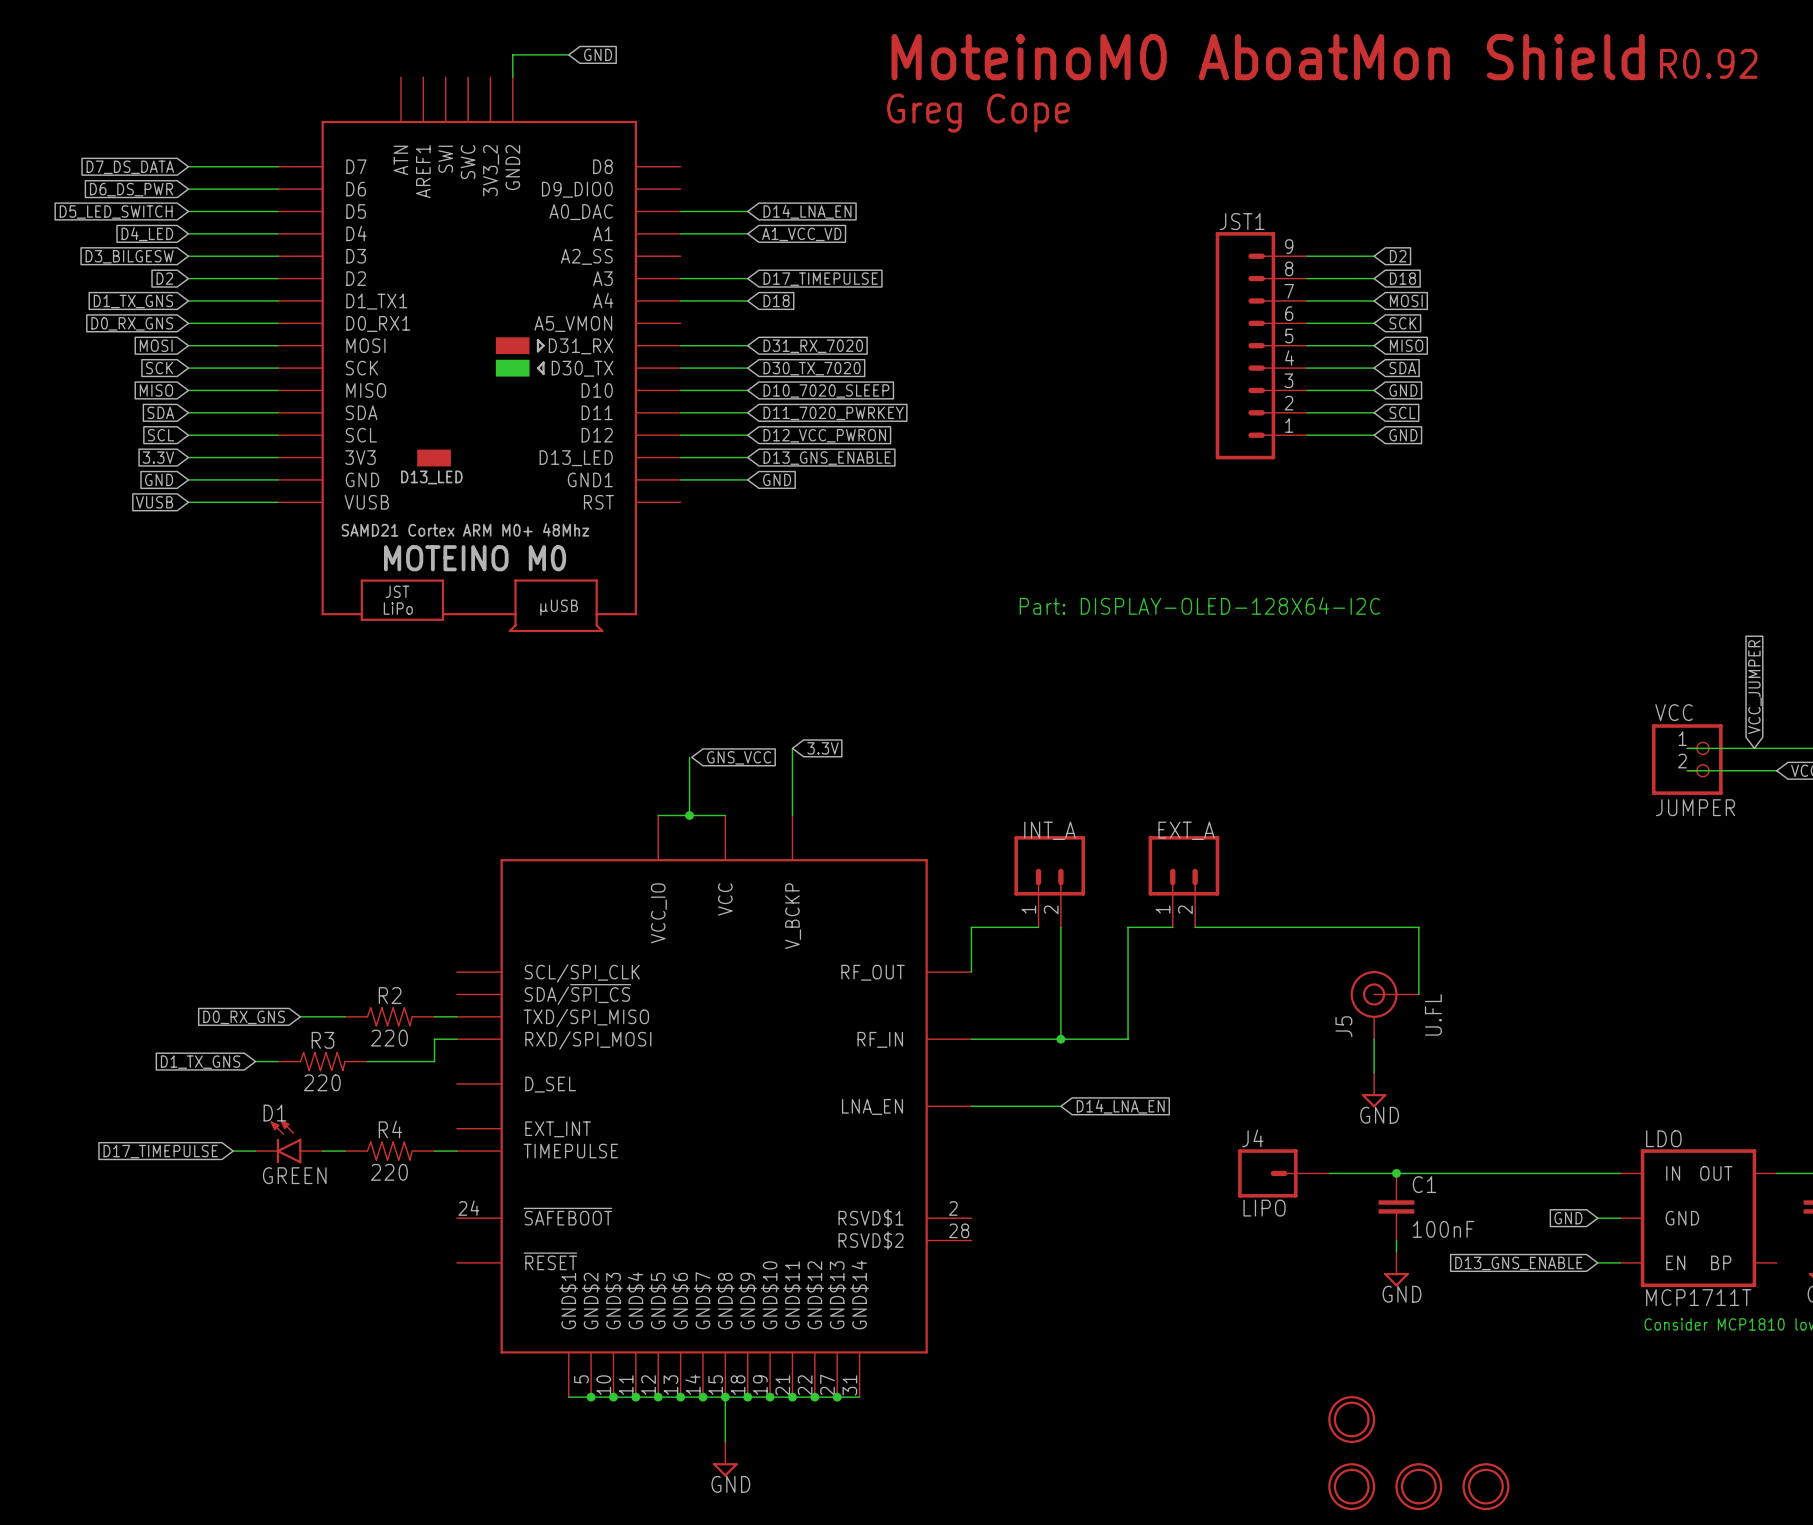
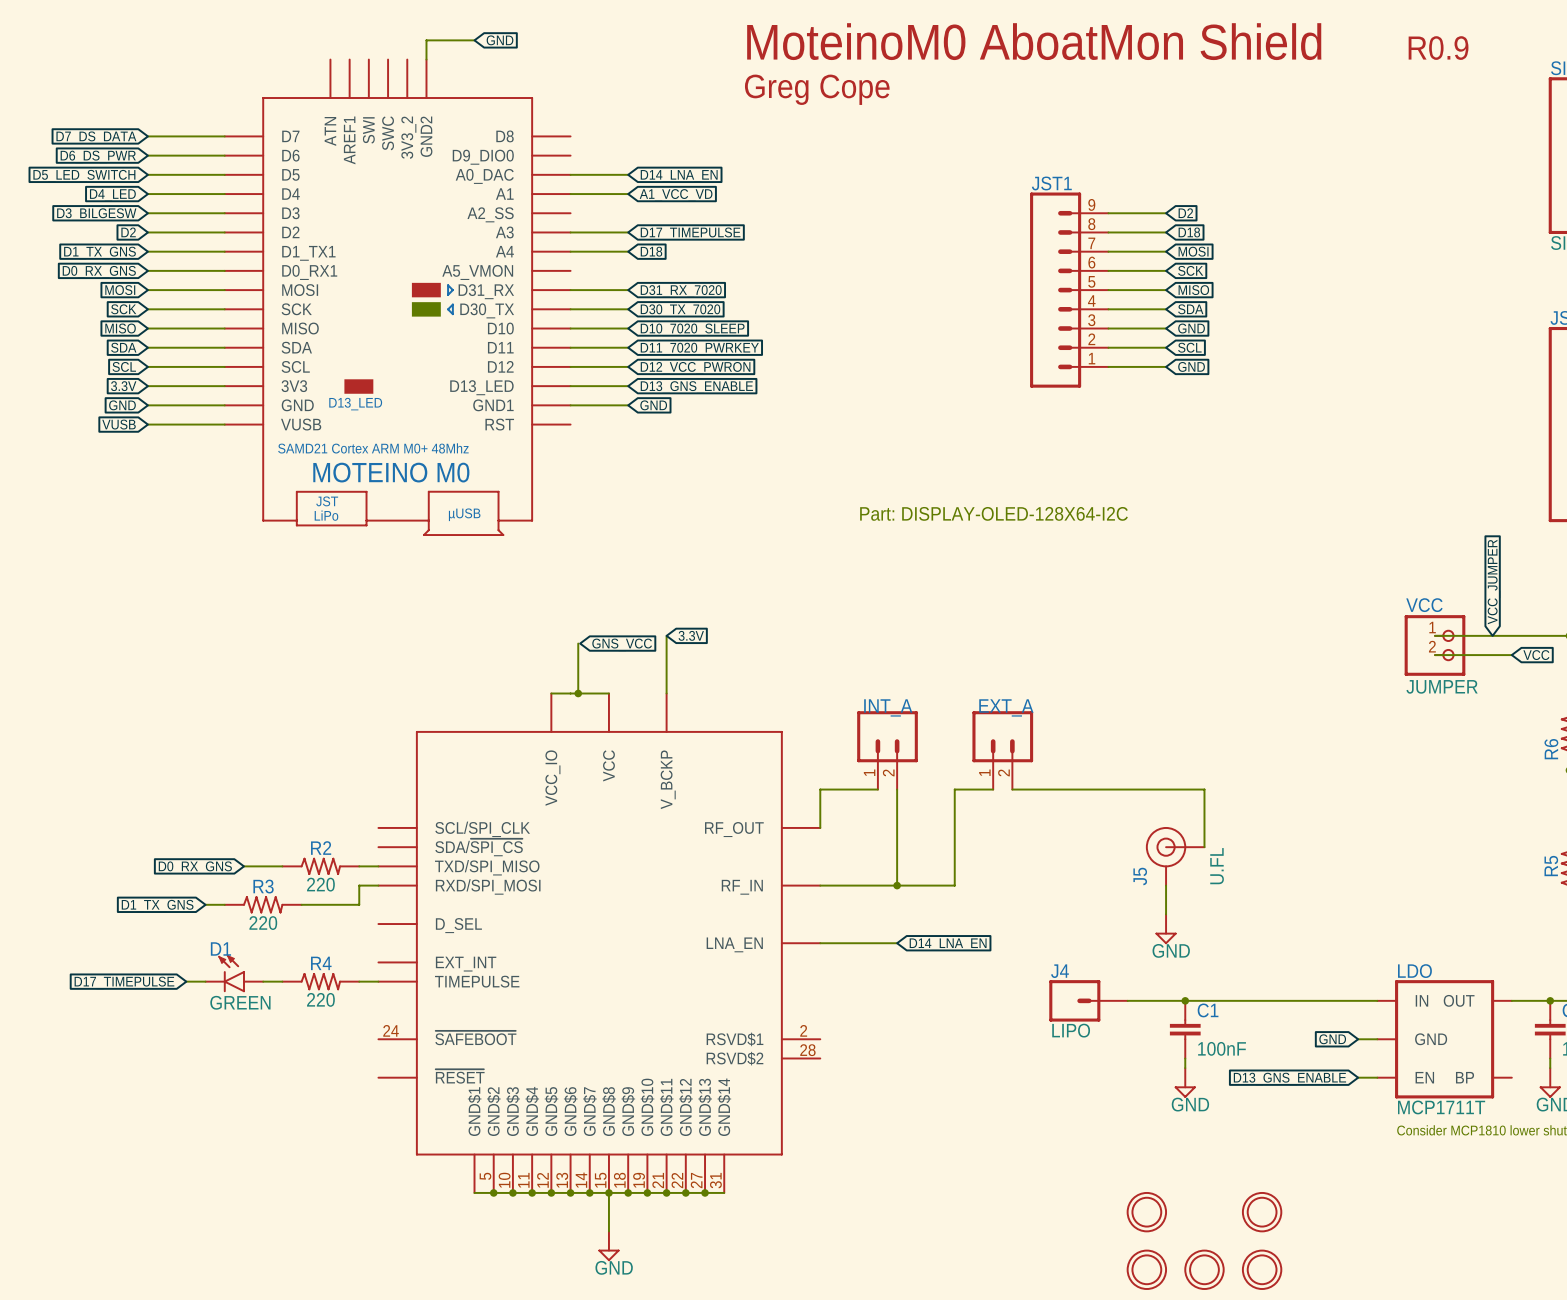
text: R0.92 (1708, 63) -> R0.9 (1438, 48)
part: none -> (1262, 1212)

